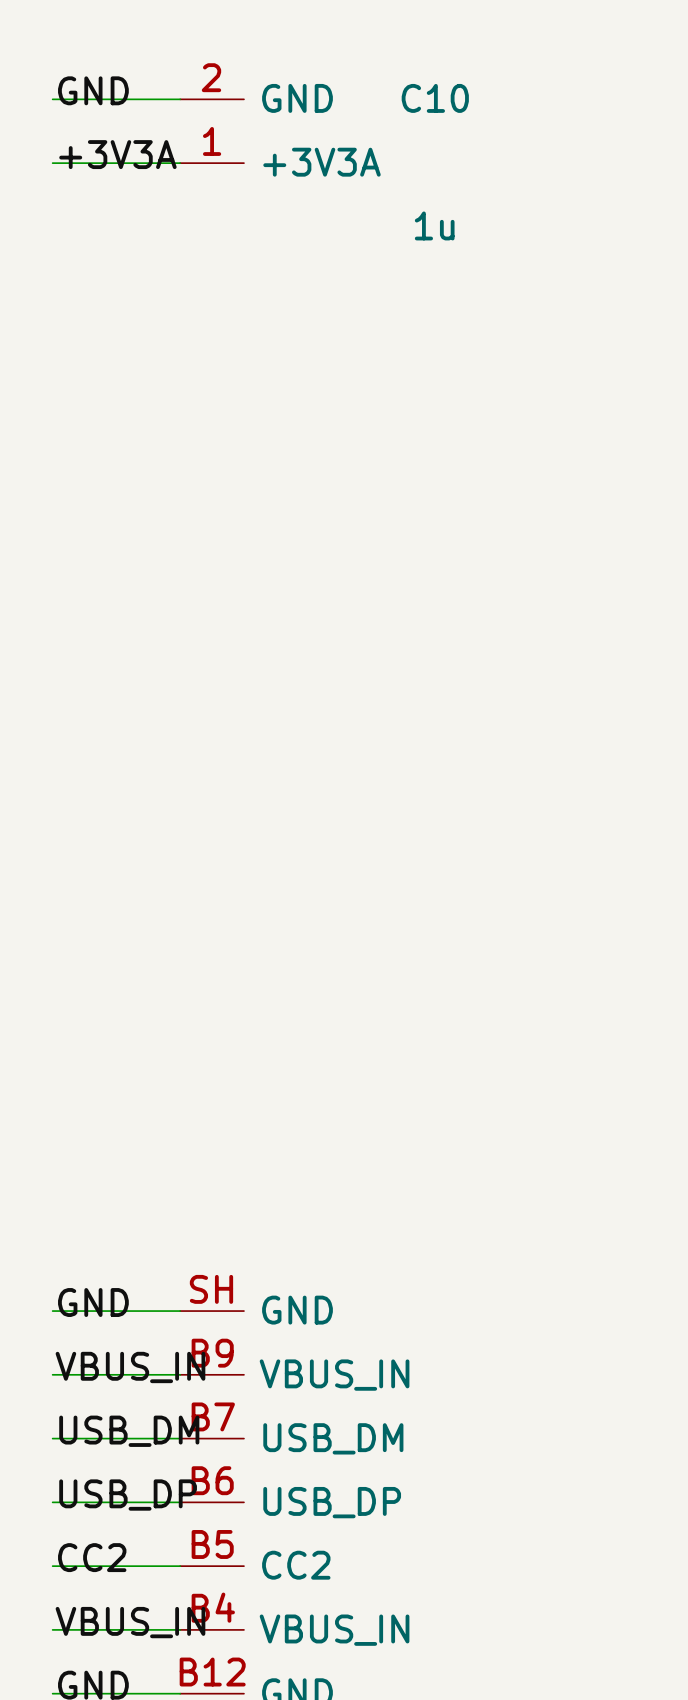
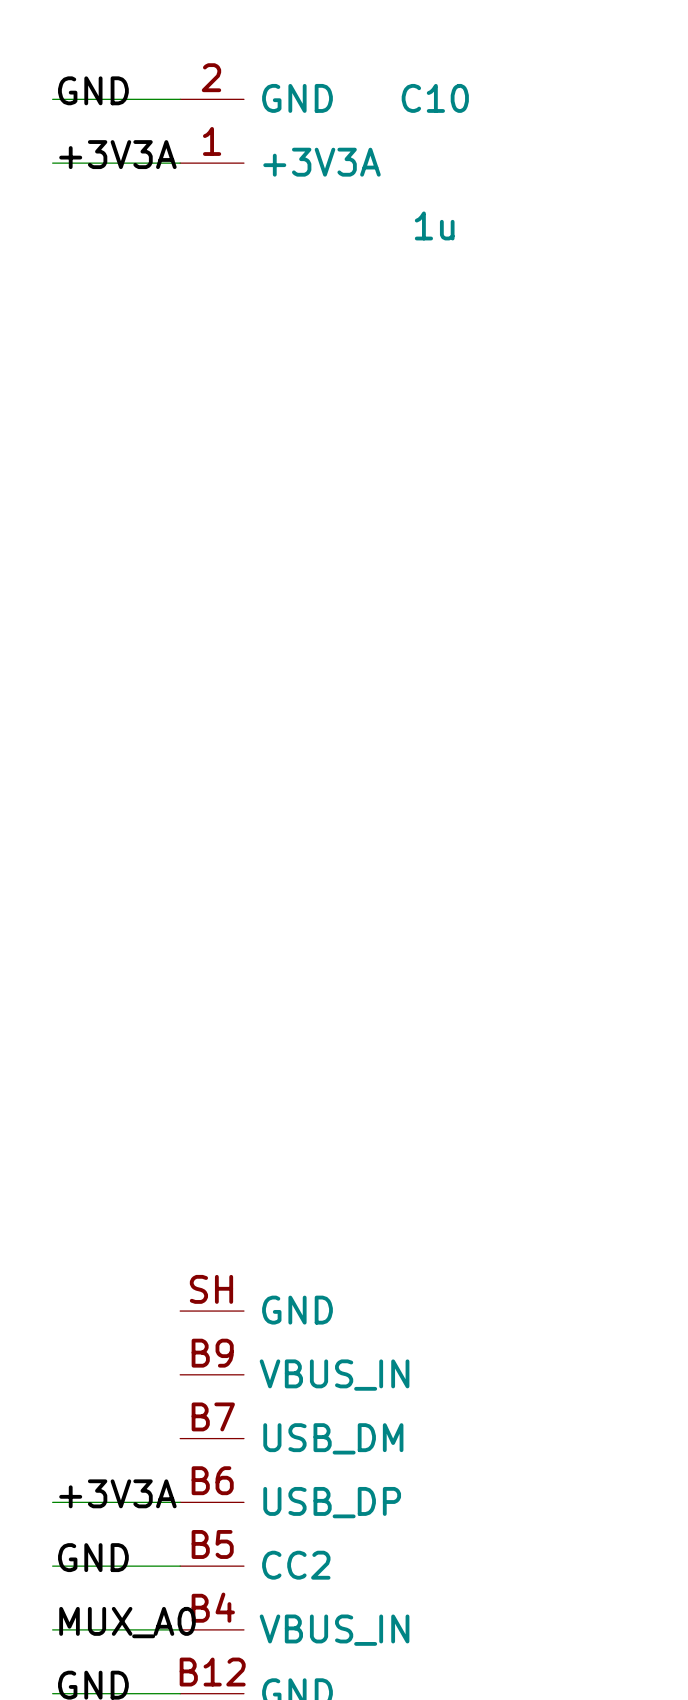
label: GND (93, 1302) -> none
wire: (52, 1311) (180, 1311) -> none
label: VBUS_IN (130, 1367) -> none
wire: (52, 1374) (180, 1374) -> none
label: USB_DM (129, 1431) -> none
wire: (52, 1438) (180, 1438) -> none
label: USB_DP (128, 1495) -> +3V3A (117, 1493)
label: CC2 (92, 1557) -> GND (93, 1557)
label: VBUS_IN (130, 1622) -> MUX_A0 (127, 1622)

